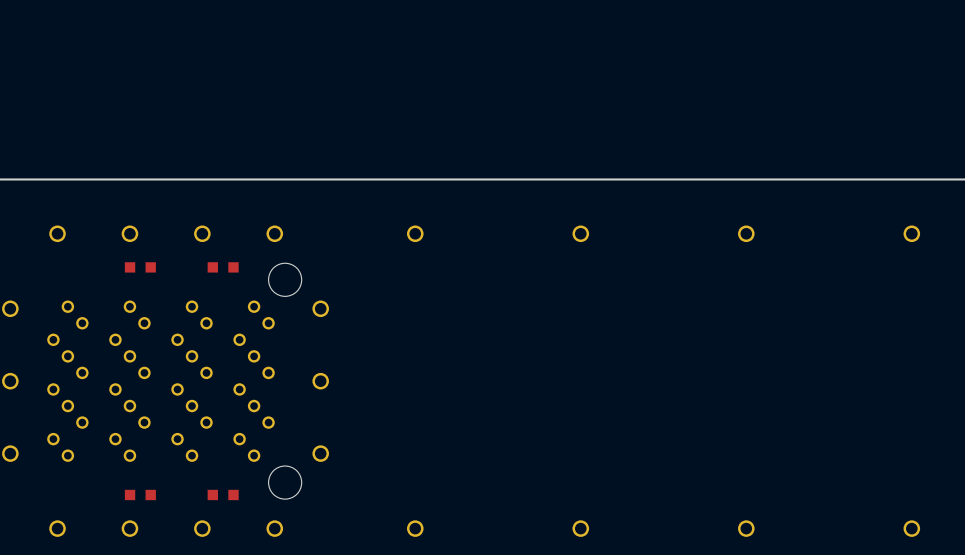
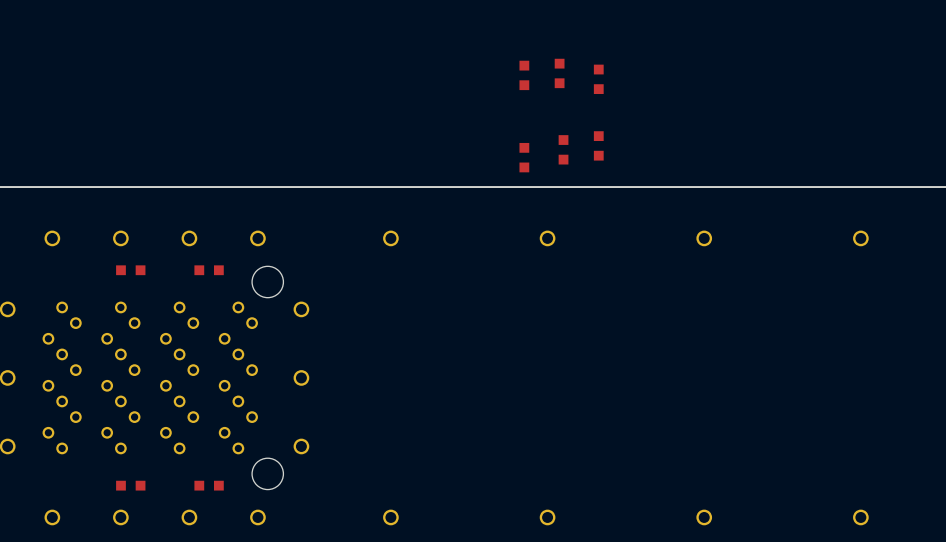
part: none -> (559, 73)
part: none -> (524, 75)
part: none -> (598, 79)
part: none -> (598, 145)
part: none -> (563, 149)
part: none -> (524, 157)

